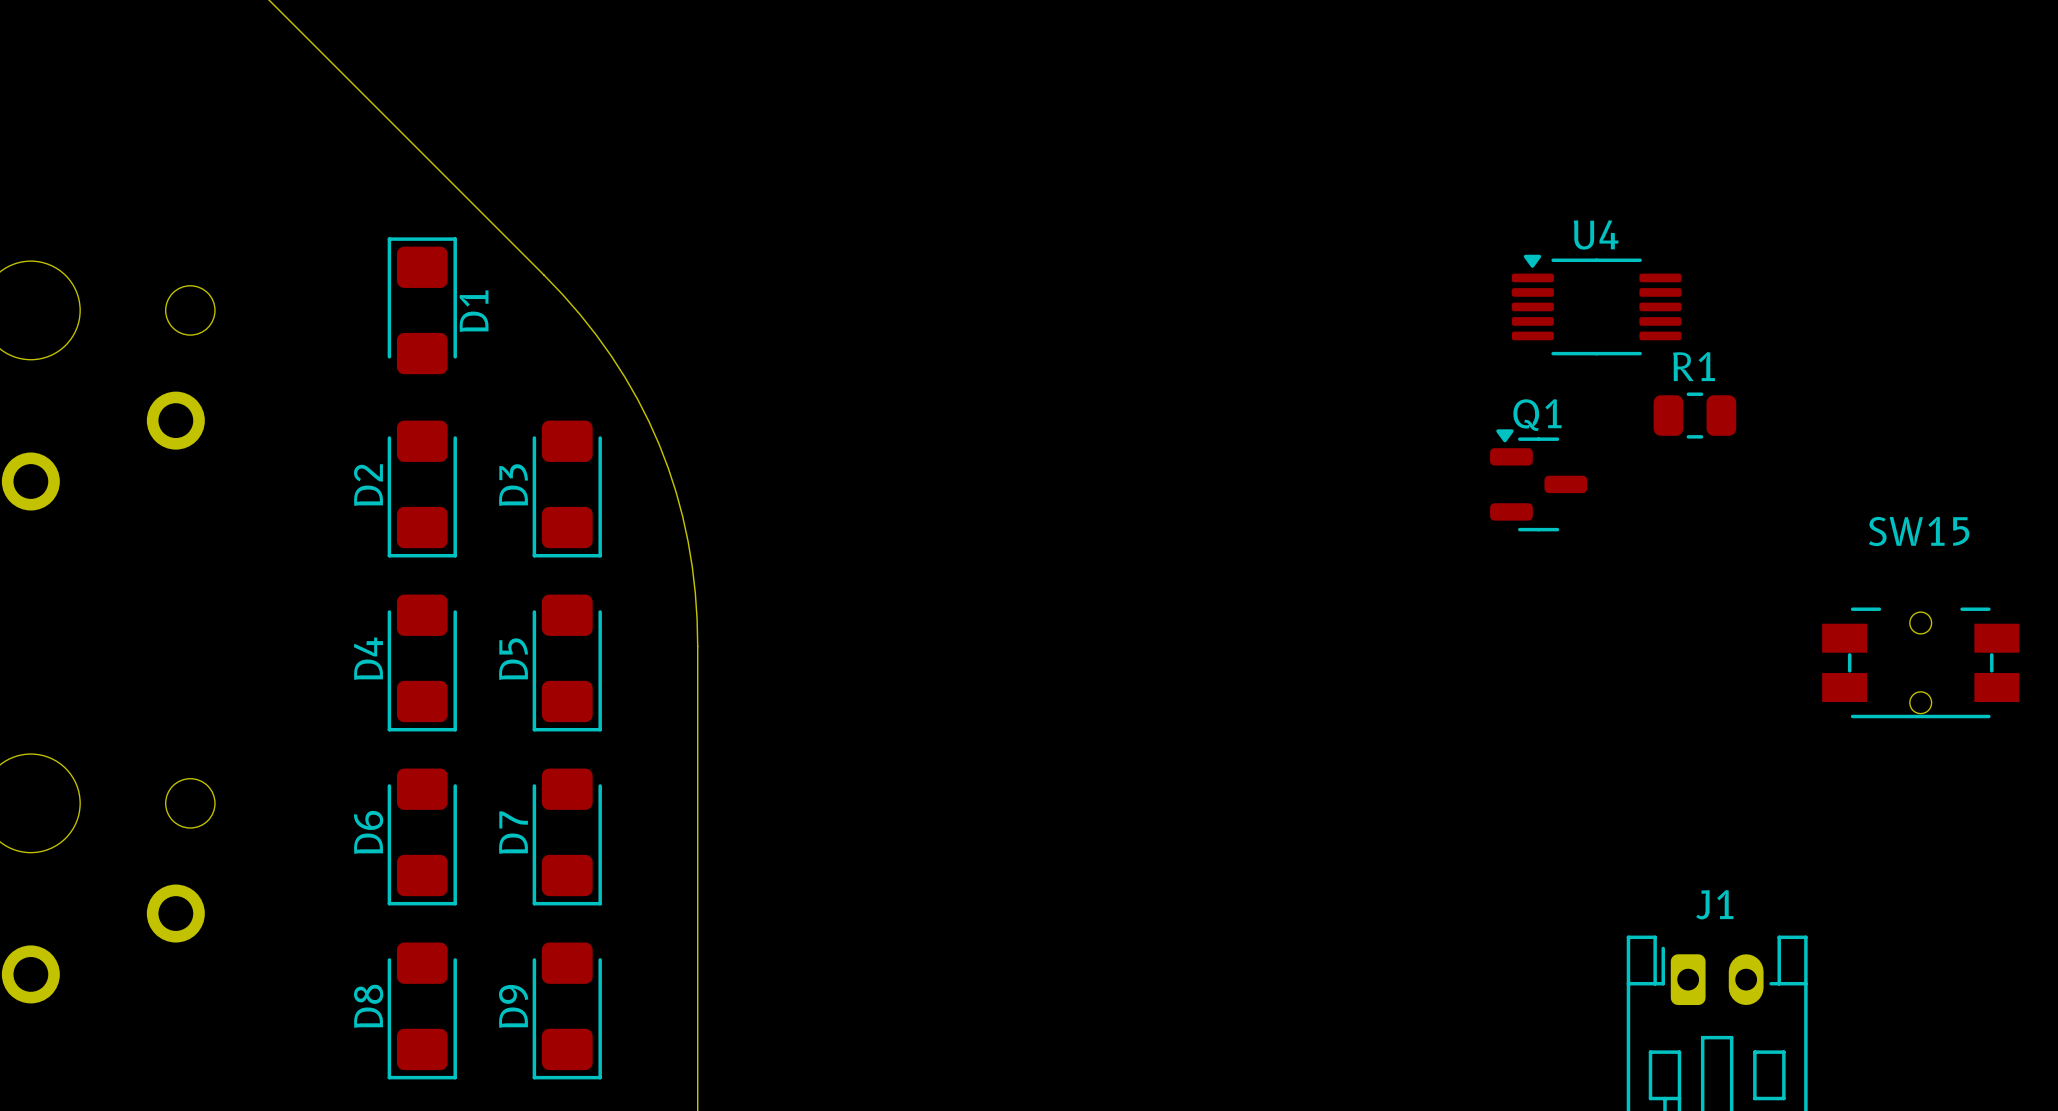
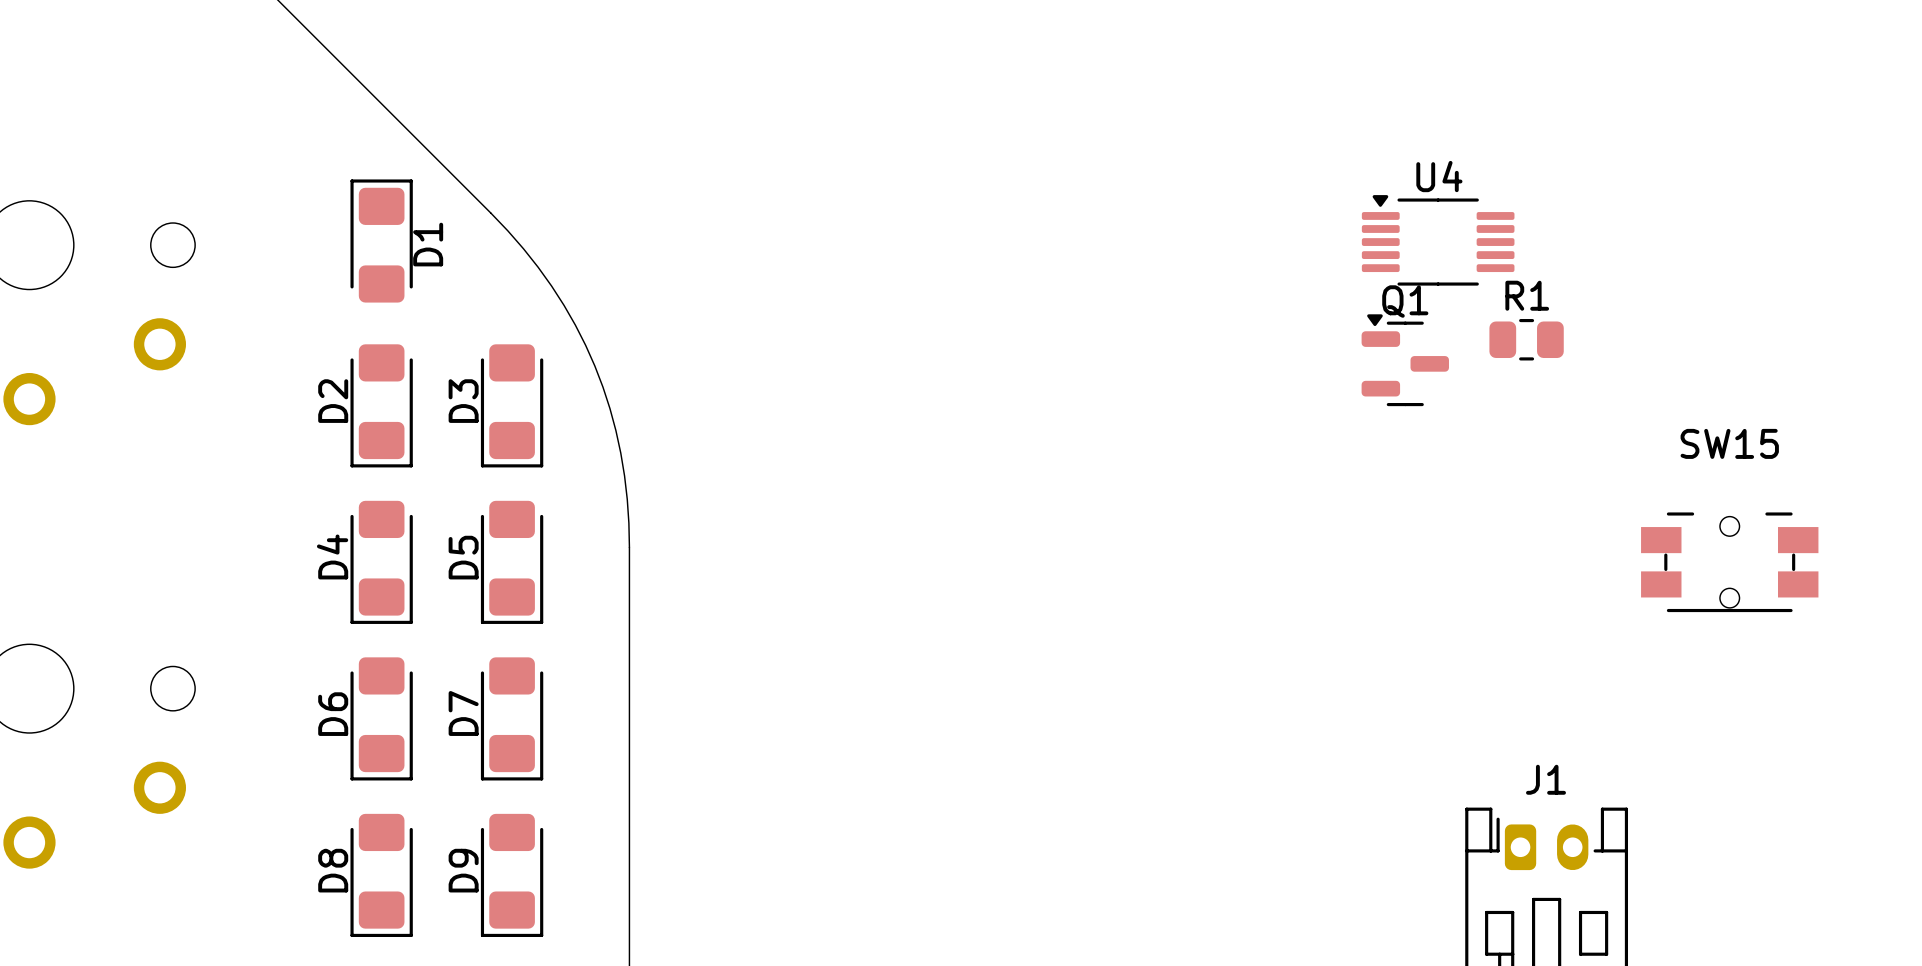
Q1 position: (1538, 480) -> (1405, 360)

